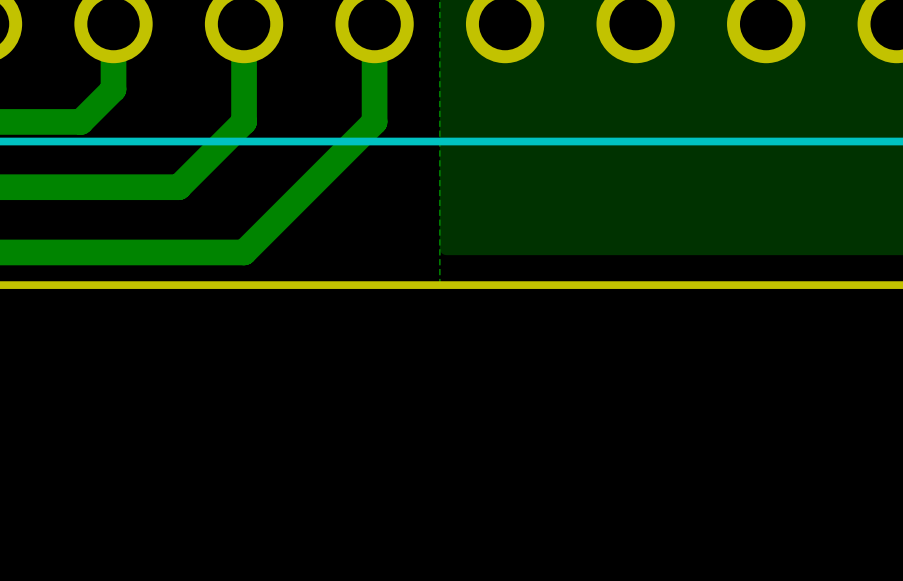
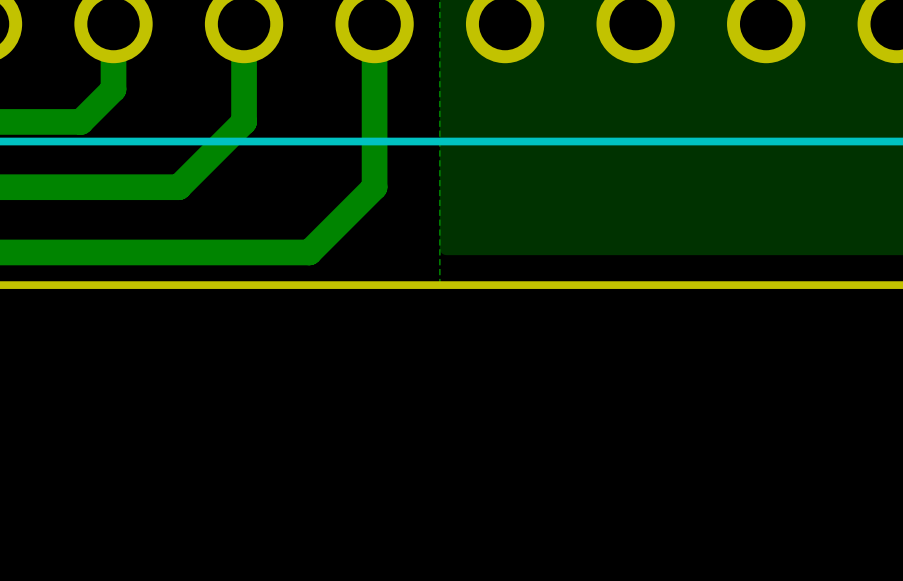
bottom track: (374, 121) (244, 252) -> (374, 121) (374, 187) (309, 252) (244, 252)

